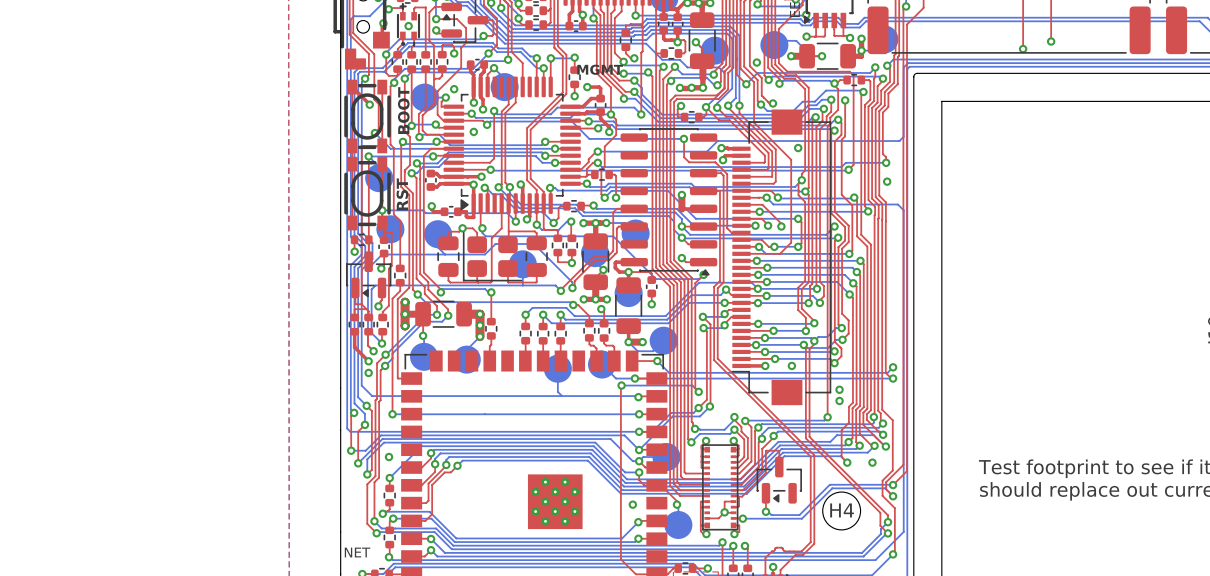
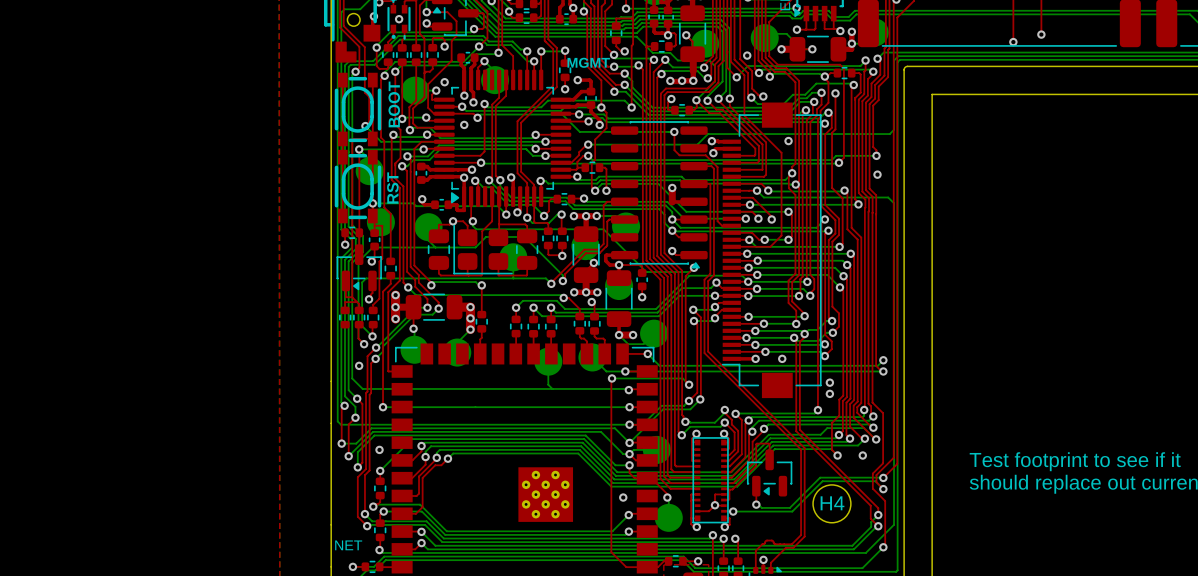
top track: (352, 87) (369, 104) -> none
via: (369, 104) -> none
top track: (354, 331) (354, 347) (368, 361) -> none
via: (368, 361) -> none

